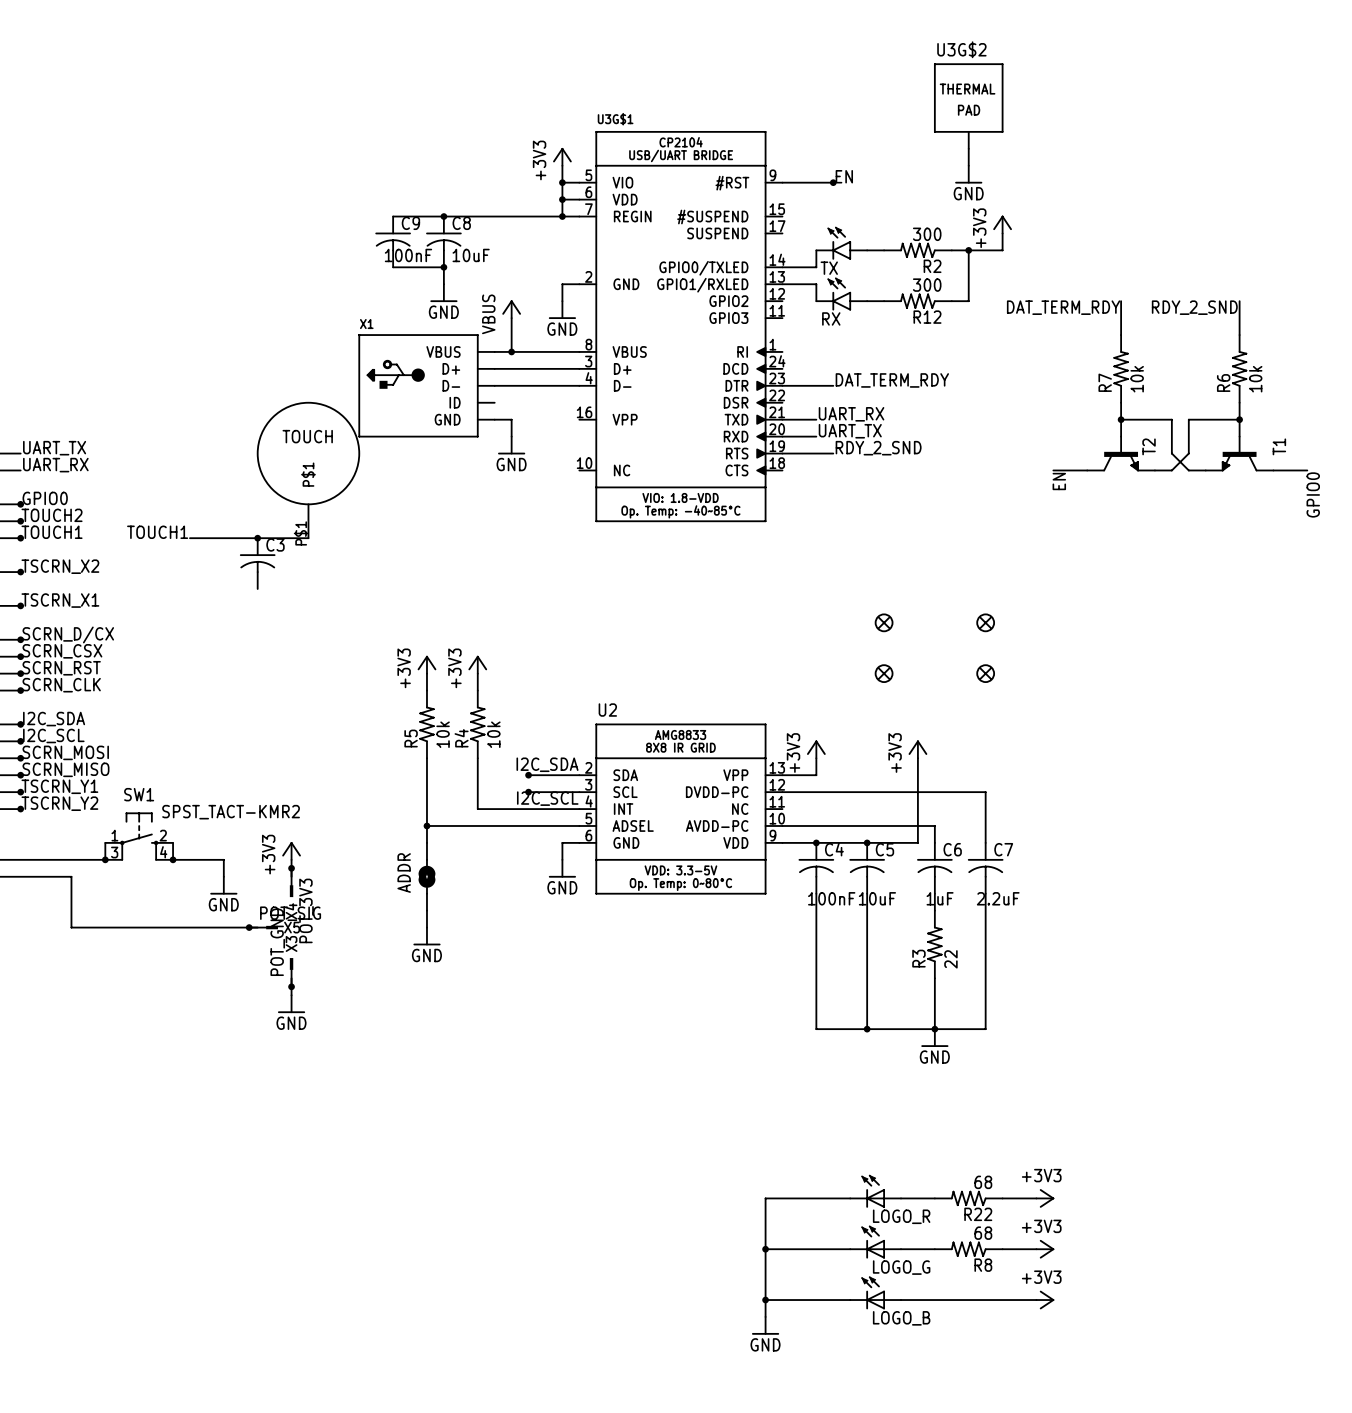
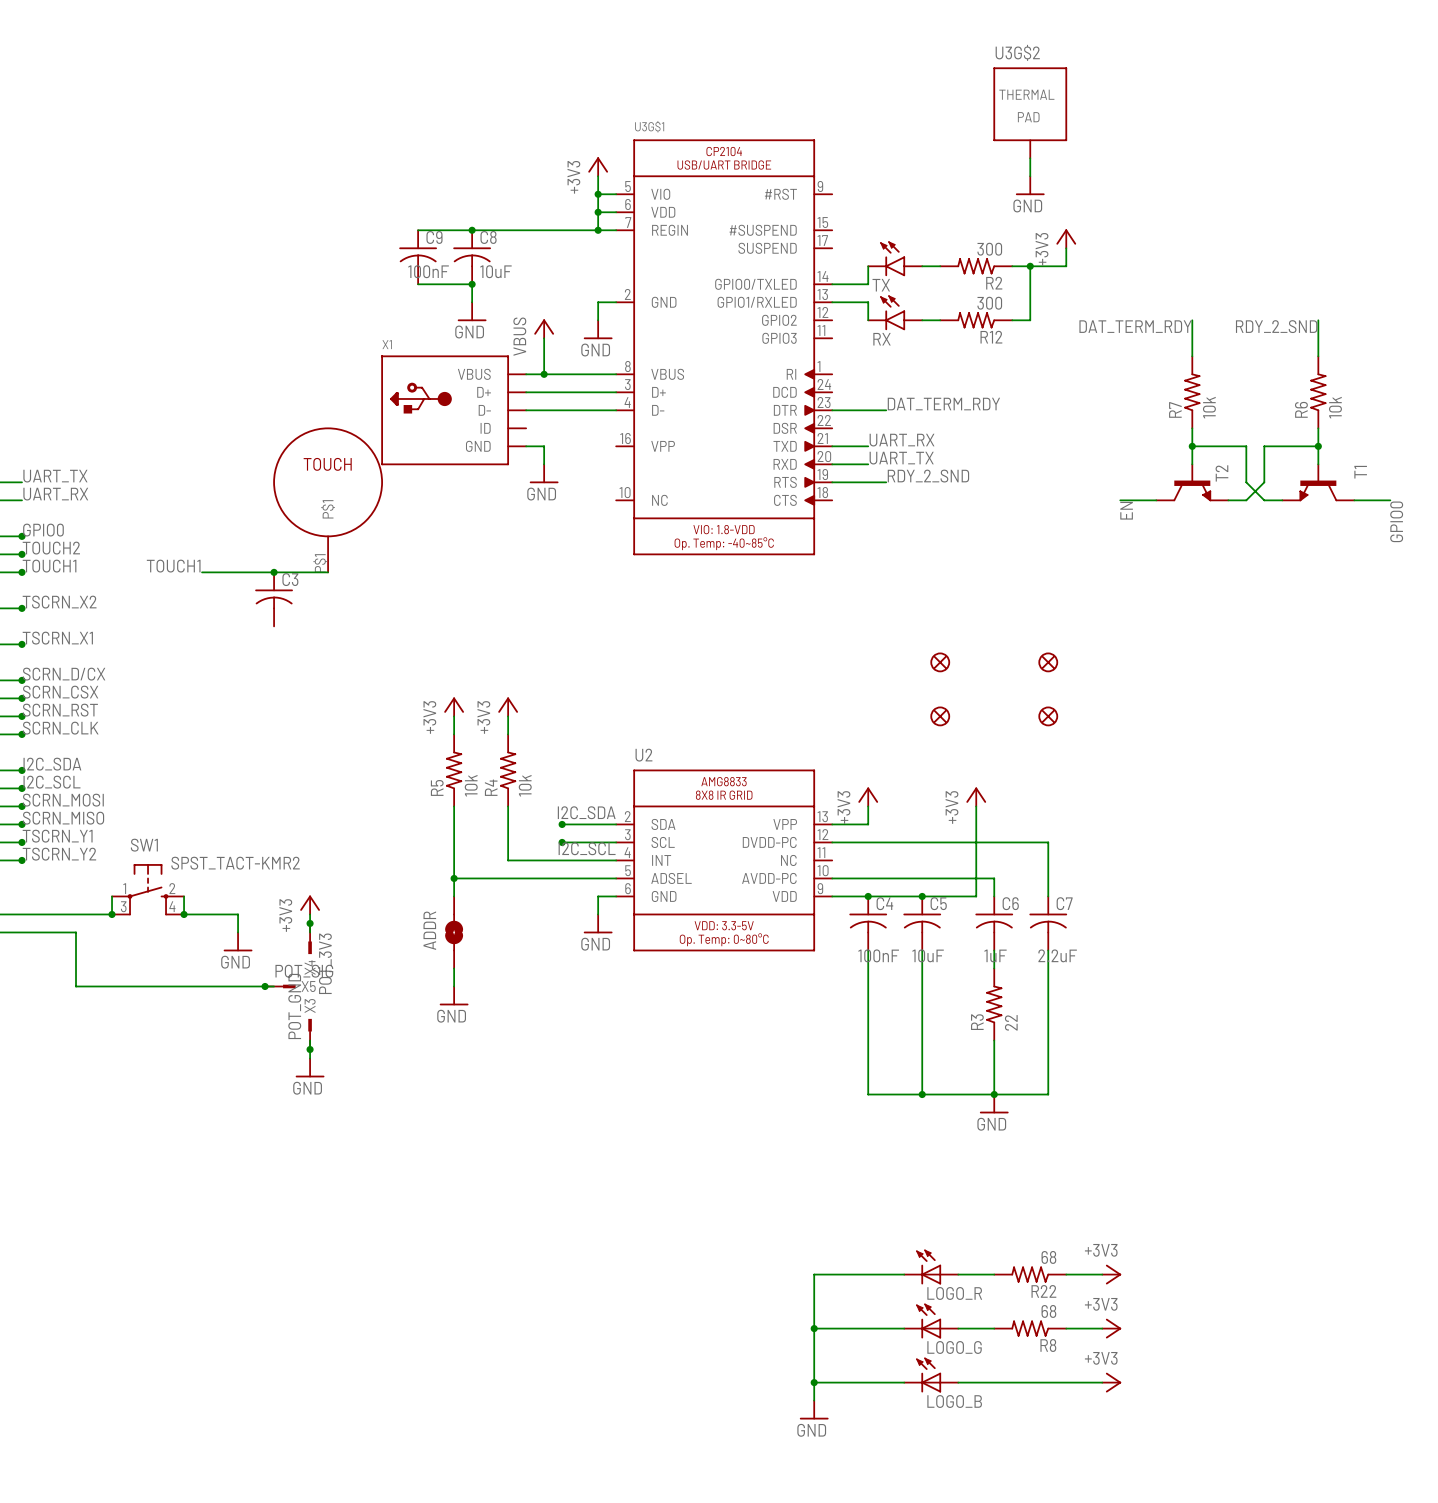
label: EN (844, 176) -> none
wire: (782, 182) (833, 182) -> none
junction: (833, 182) -> none

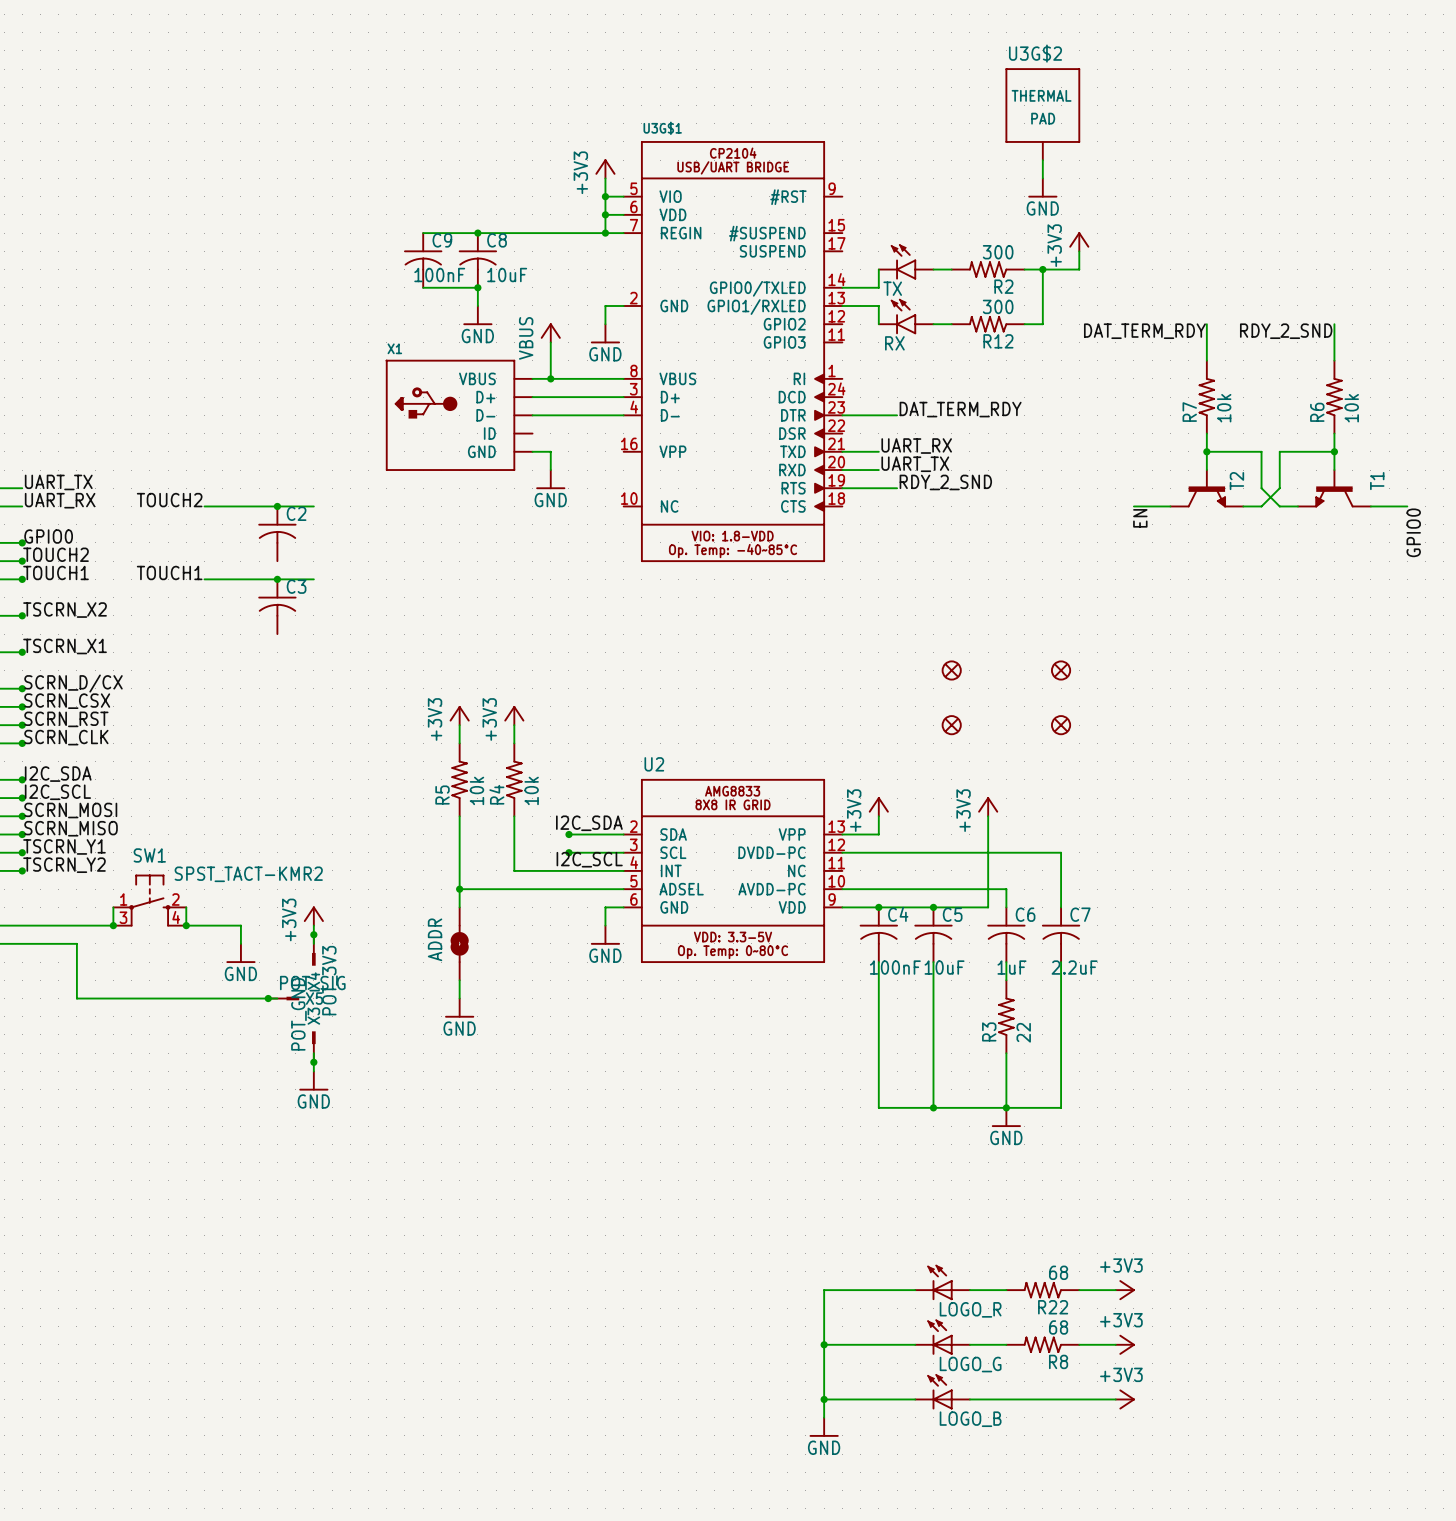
label: none -> TOUCH2 (169, 500)
TOUCH: (328, 499) -> none
wire: none -> (204, 506) (313, 506)
junction: none -> (277, 506)
C2: none -> (277, 533)
wire: (310, 572) (328, 572) -> none

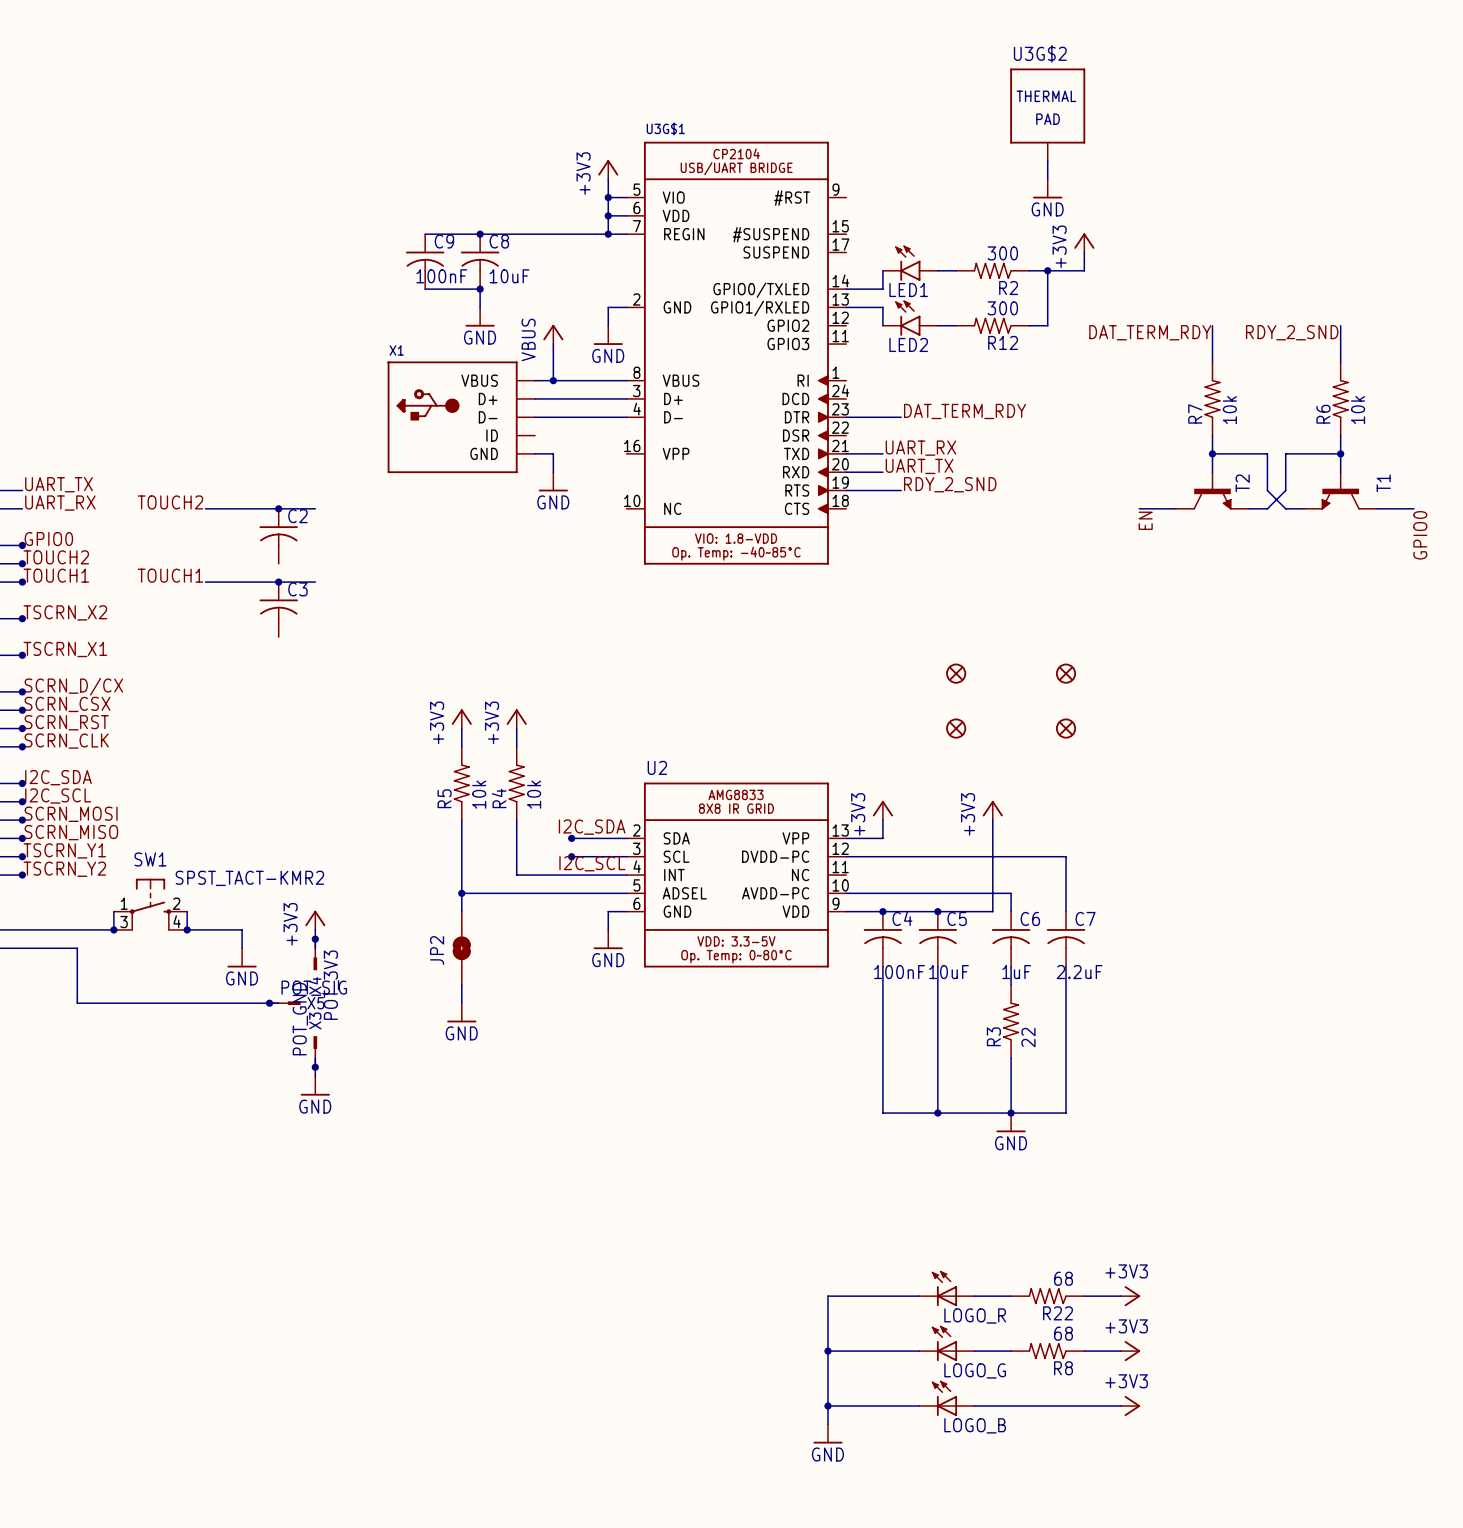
TX name: TX (892, 288) -> LED1 (908, 290)
RX name: RX (894, 343) -> LED2 (908, 344)
ADDR name: ADDR (435, 939) -> JP2 (437, 950)

